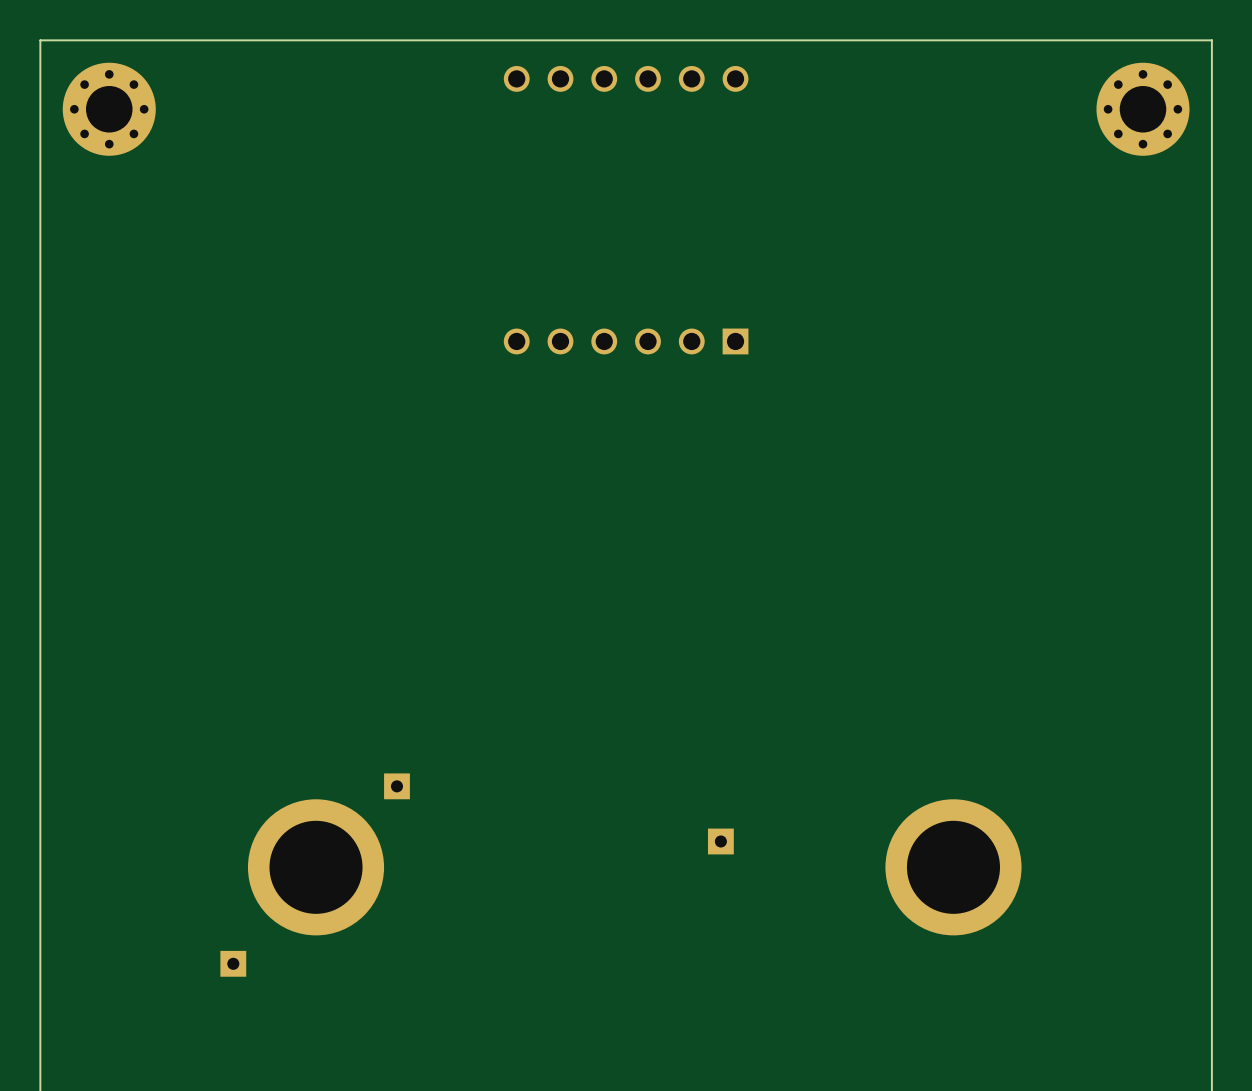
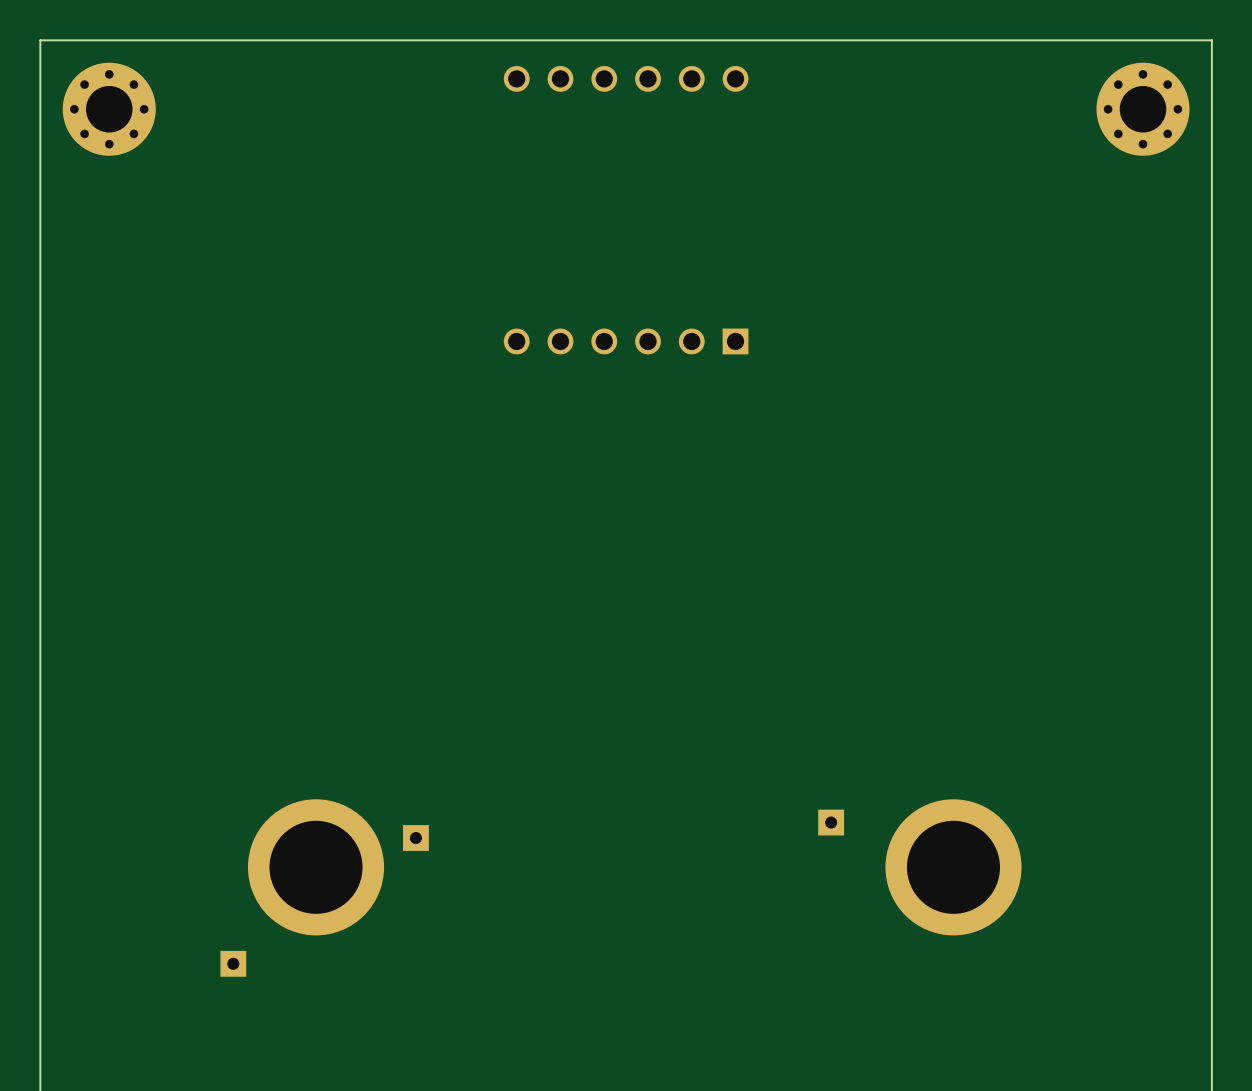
part position: (396, 786) -> (415, 838)
part position: (720, 841) -> (831, 822)

